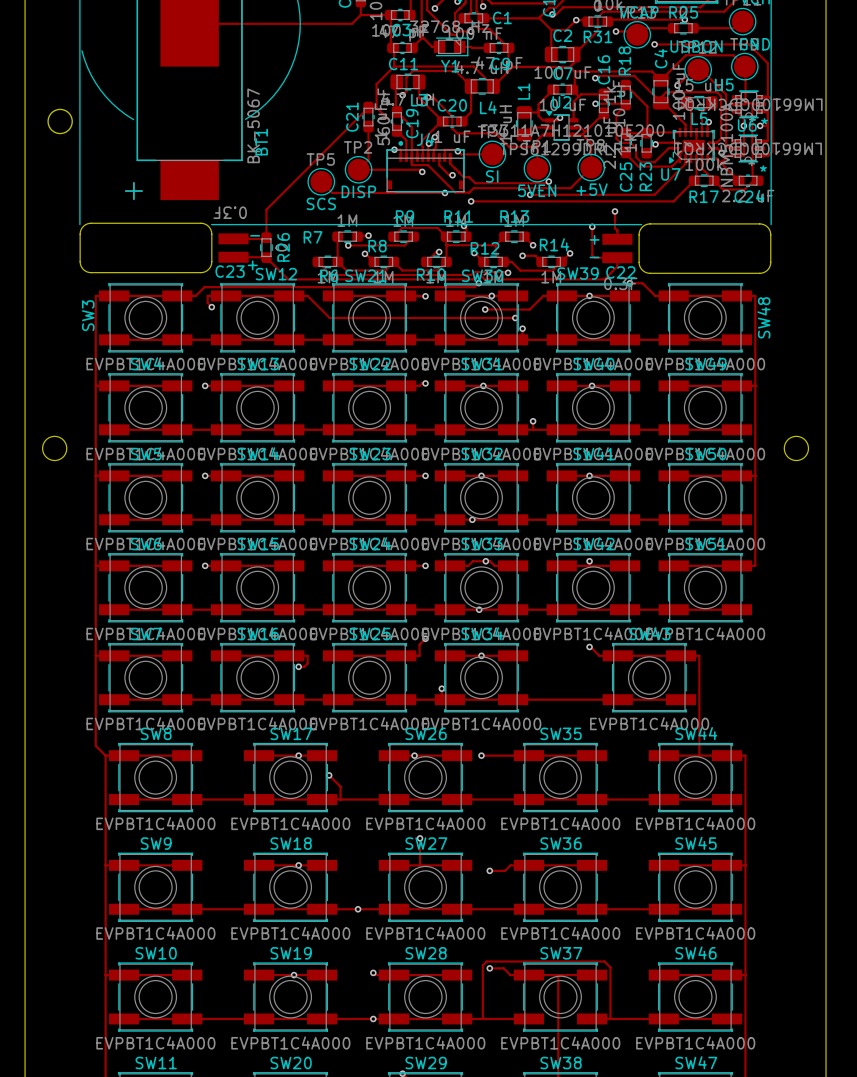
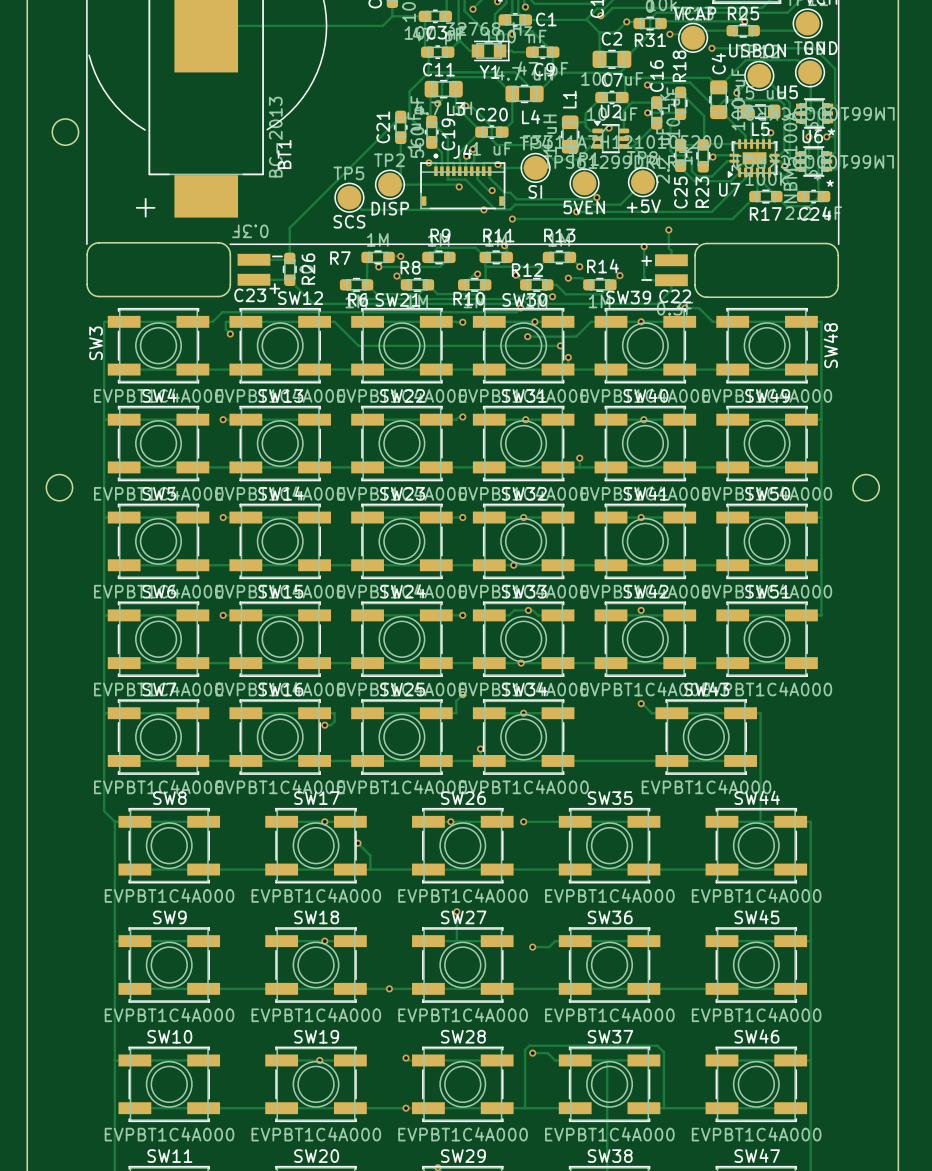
BT1 value: BK-5067 (253, 125) -> BC-2013 (275, 137)

